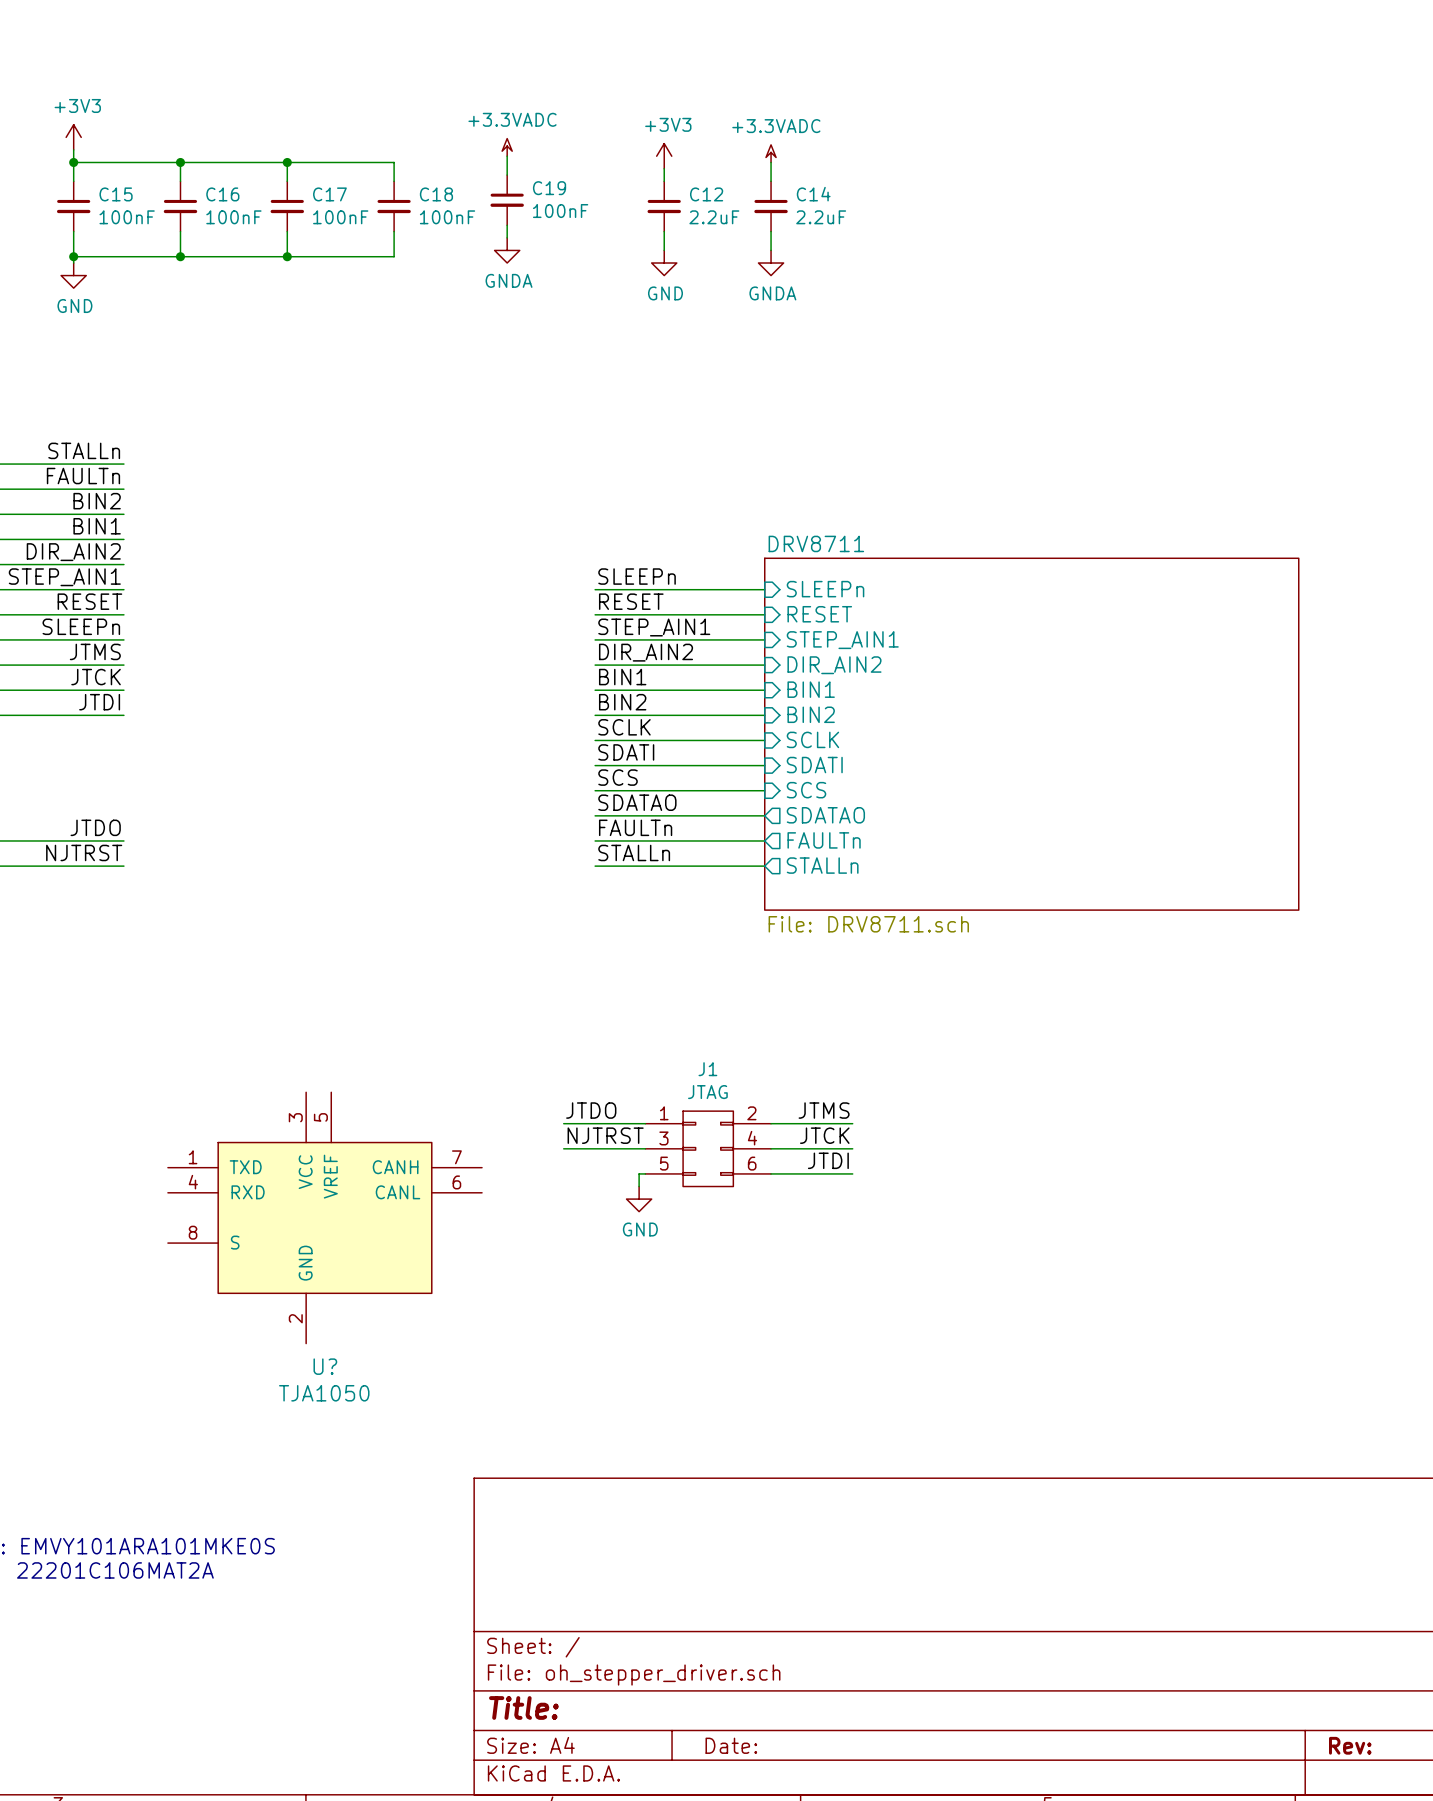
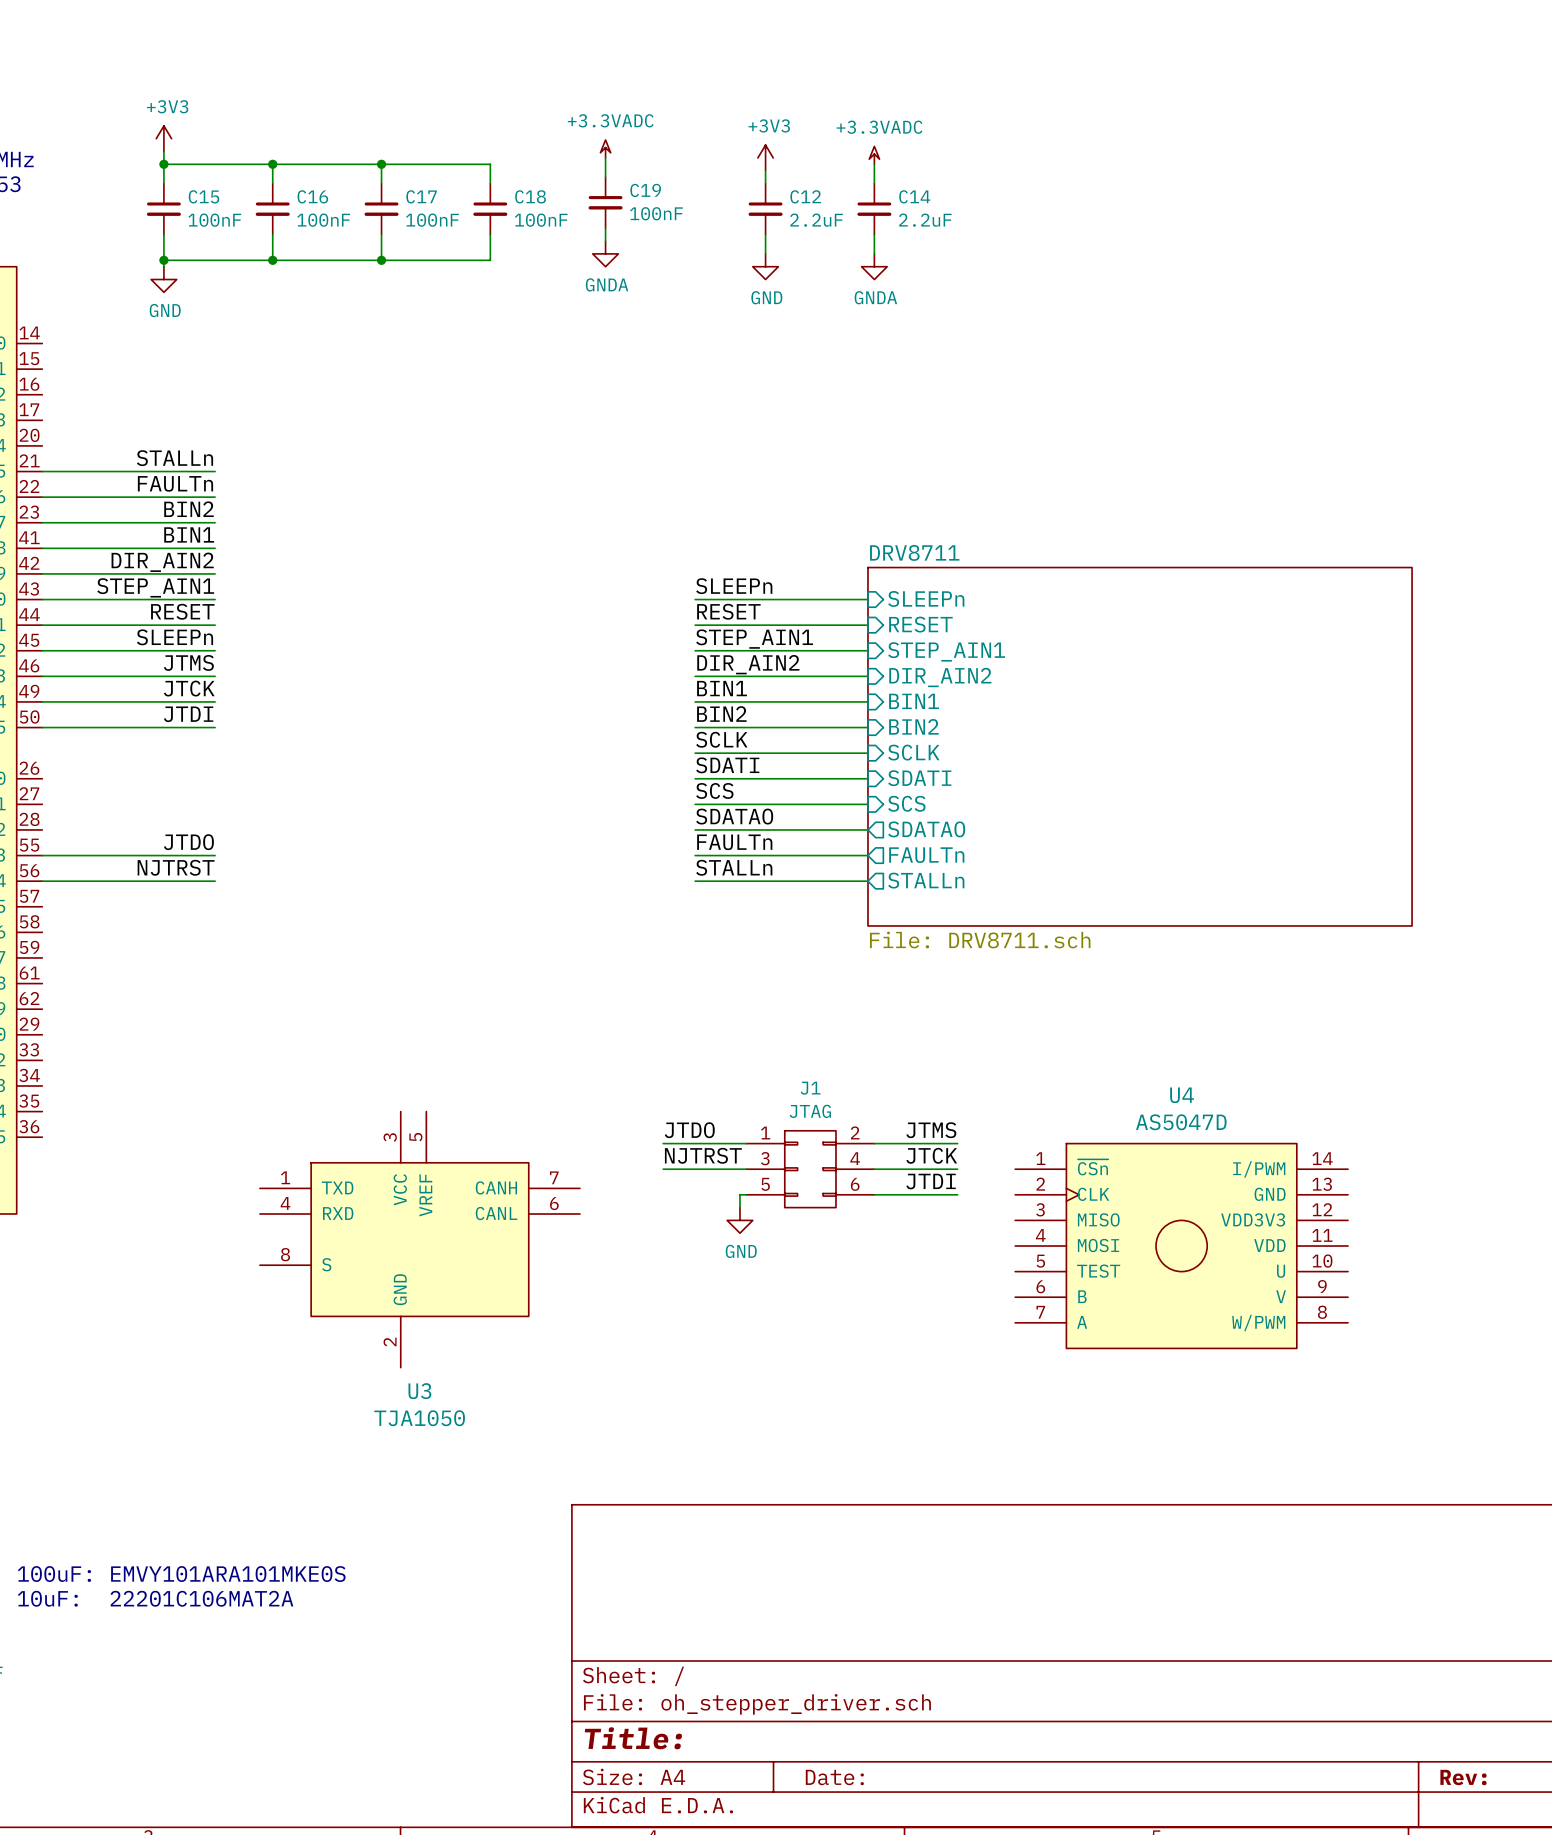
U4: none -> AS5047D (1181, 1246)
U? name: U? (325, 1366) -> U3 (419, 1391)

